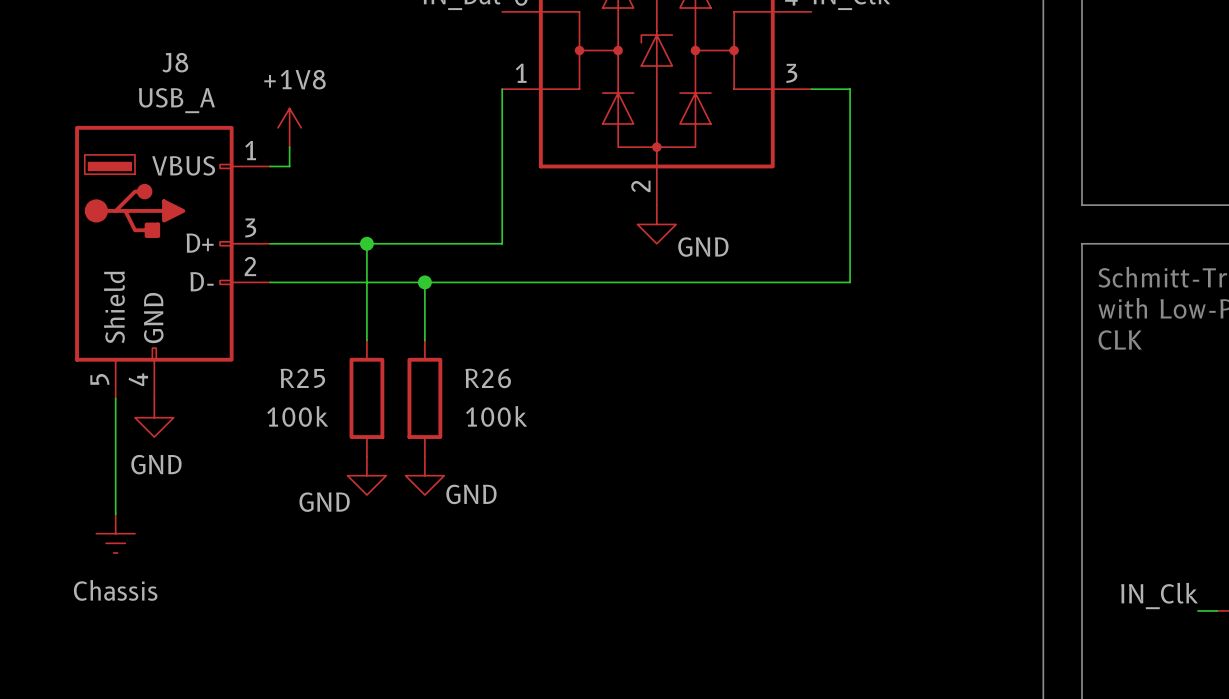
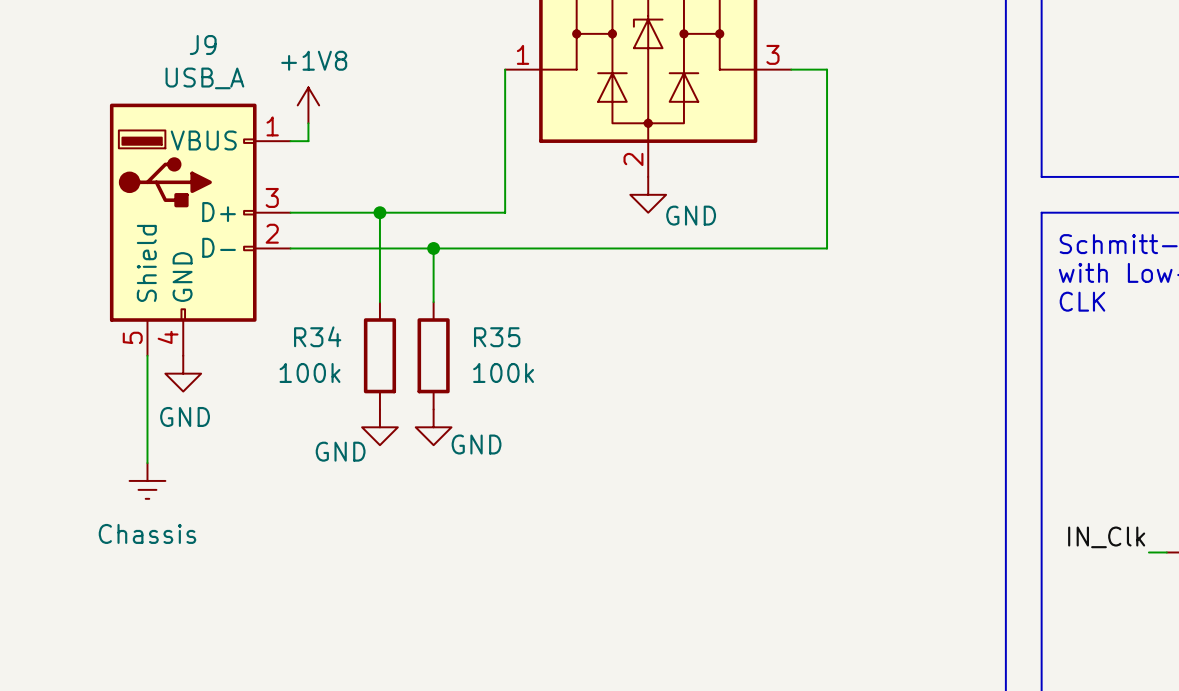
J8 name: J8 (175, 62) -> J9 (203, 45)
R25 name: R25 (302, 378) -> R34 (317, 336)
R26 name: R26 (488, 378) -> R35 (497, 337)

